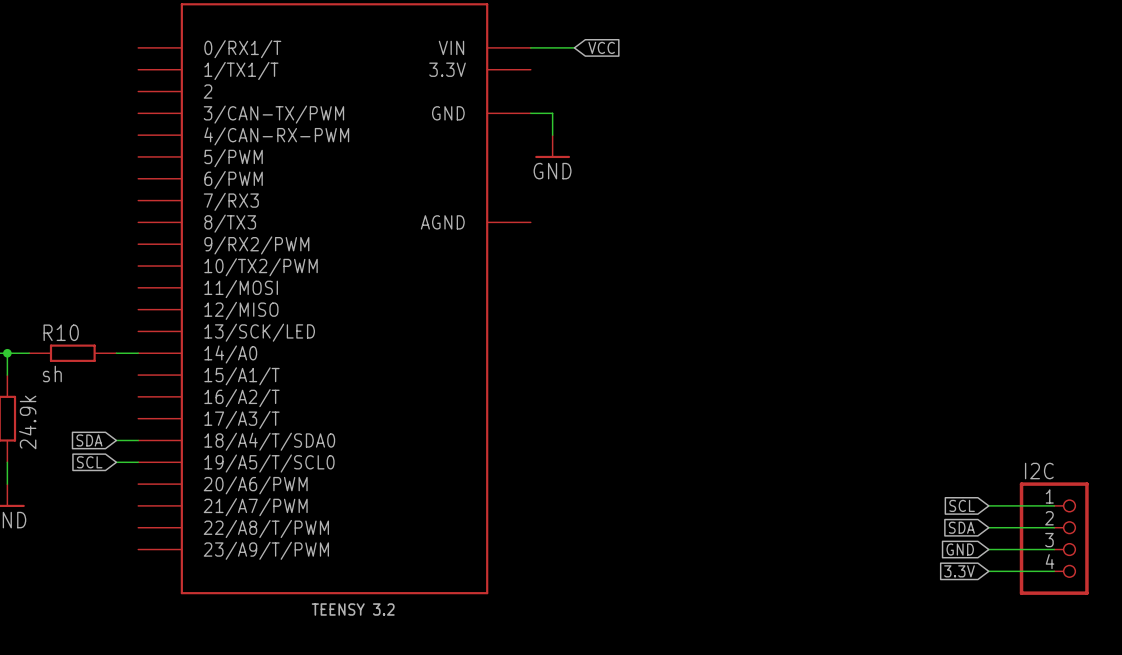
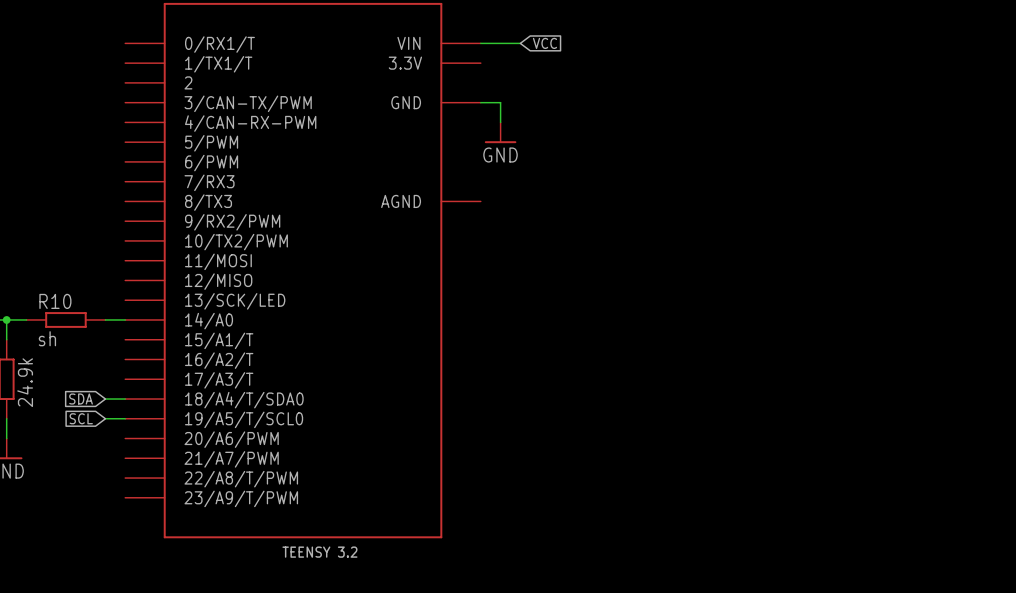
global label: SCL (962, 505) -> none
wire: (988, 505) (1054, 505) -> none
global label: SDA (961, 527) -> none
wire: (988, 527) (1054, 527) -> none
I2C: (1054, 538) -> none
global label: GND (960, 549) -> none
wire: (988, 549) (1054, 549) -> none
global label: 3.3V (959, 571) -> none
wire: (988, 571) (1054, 571) -> none

